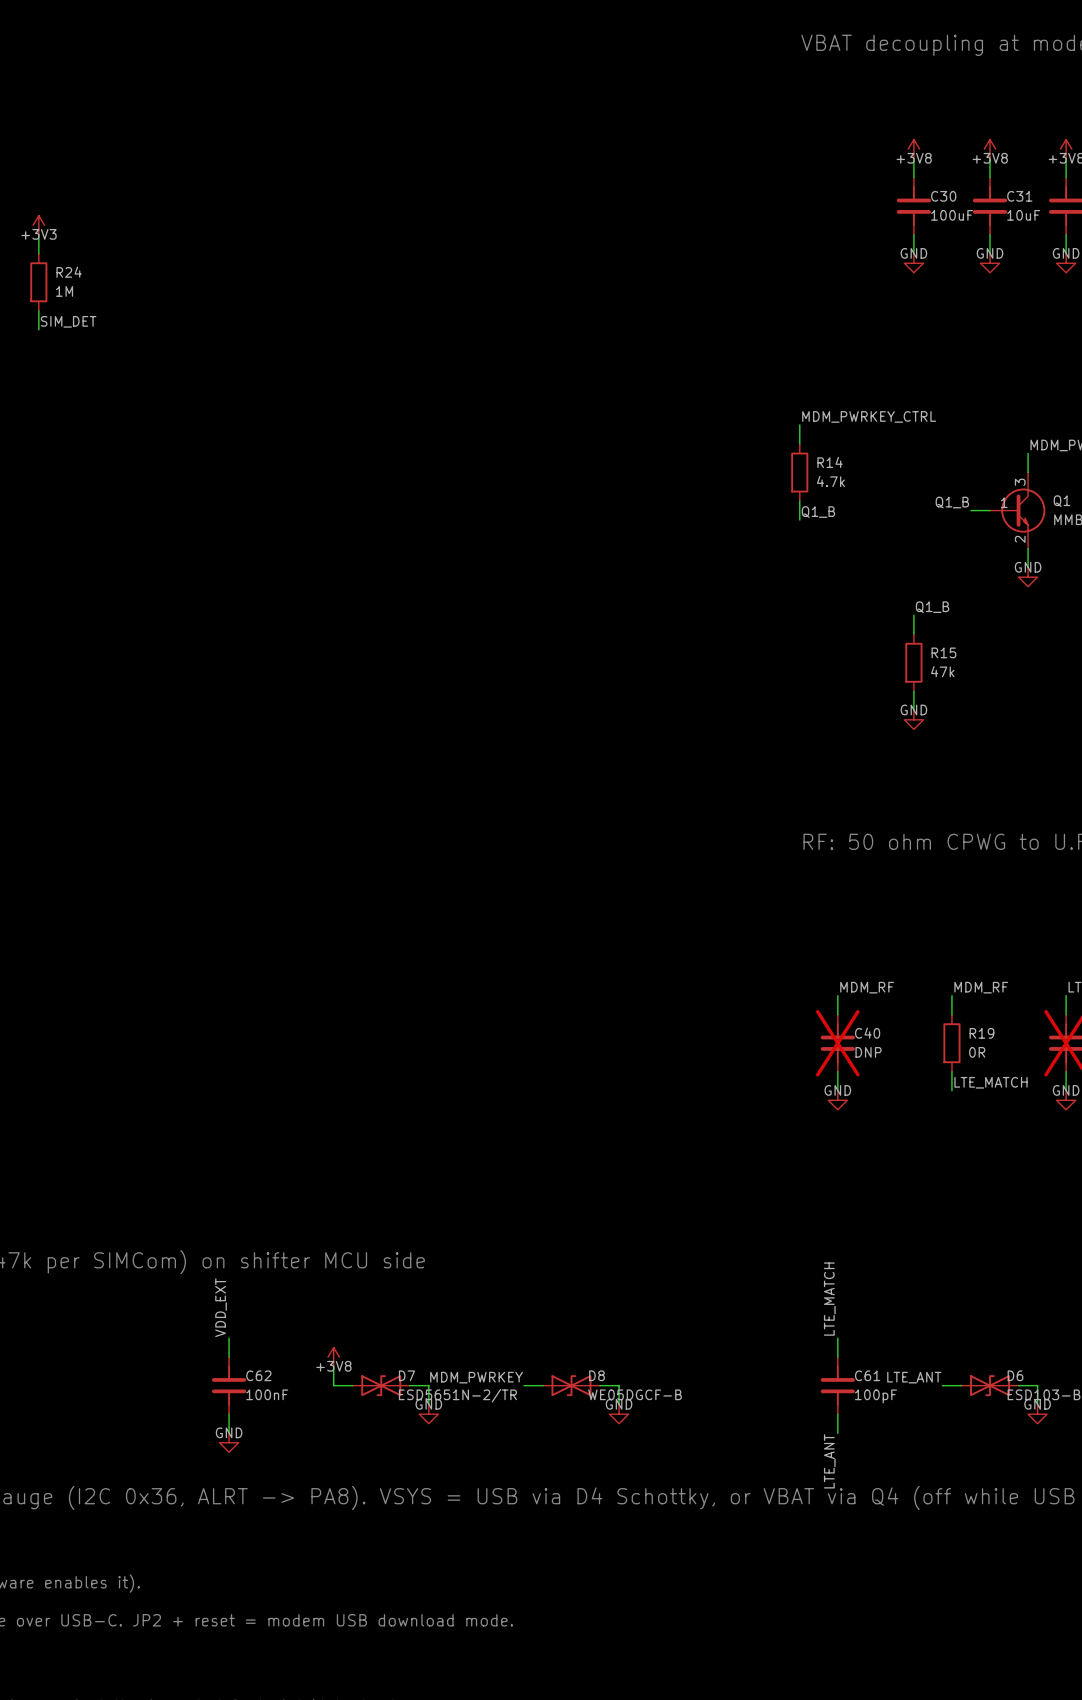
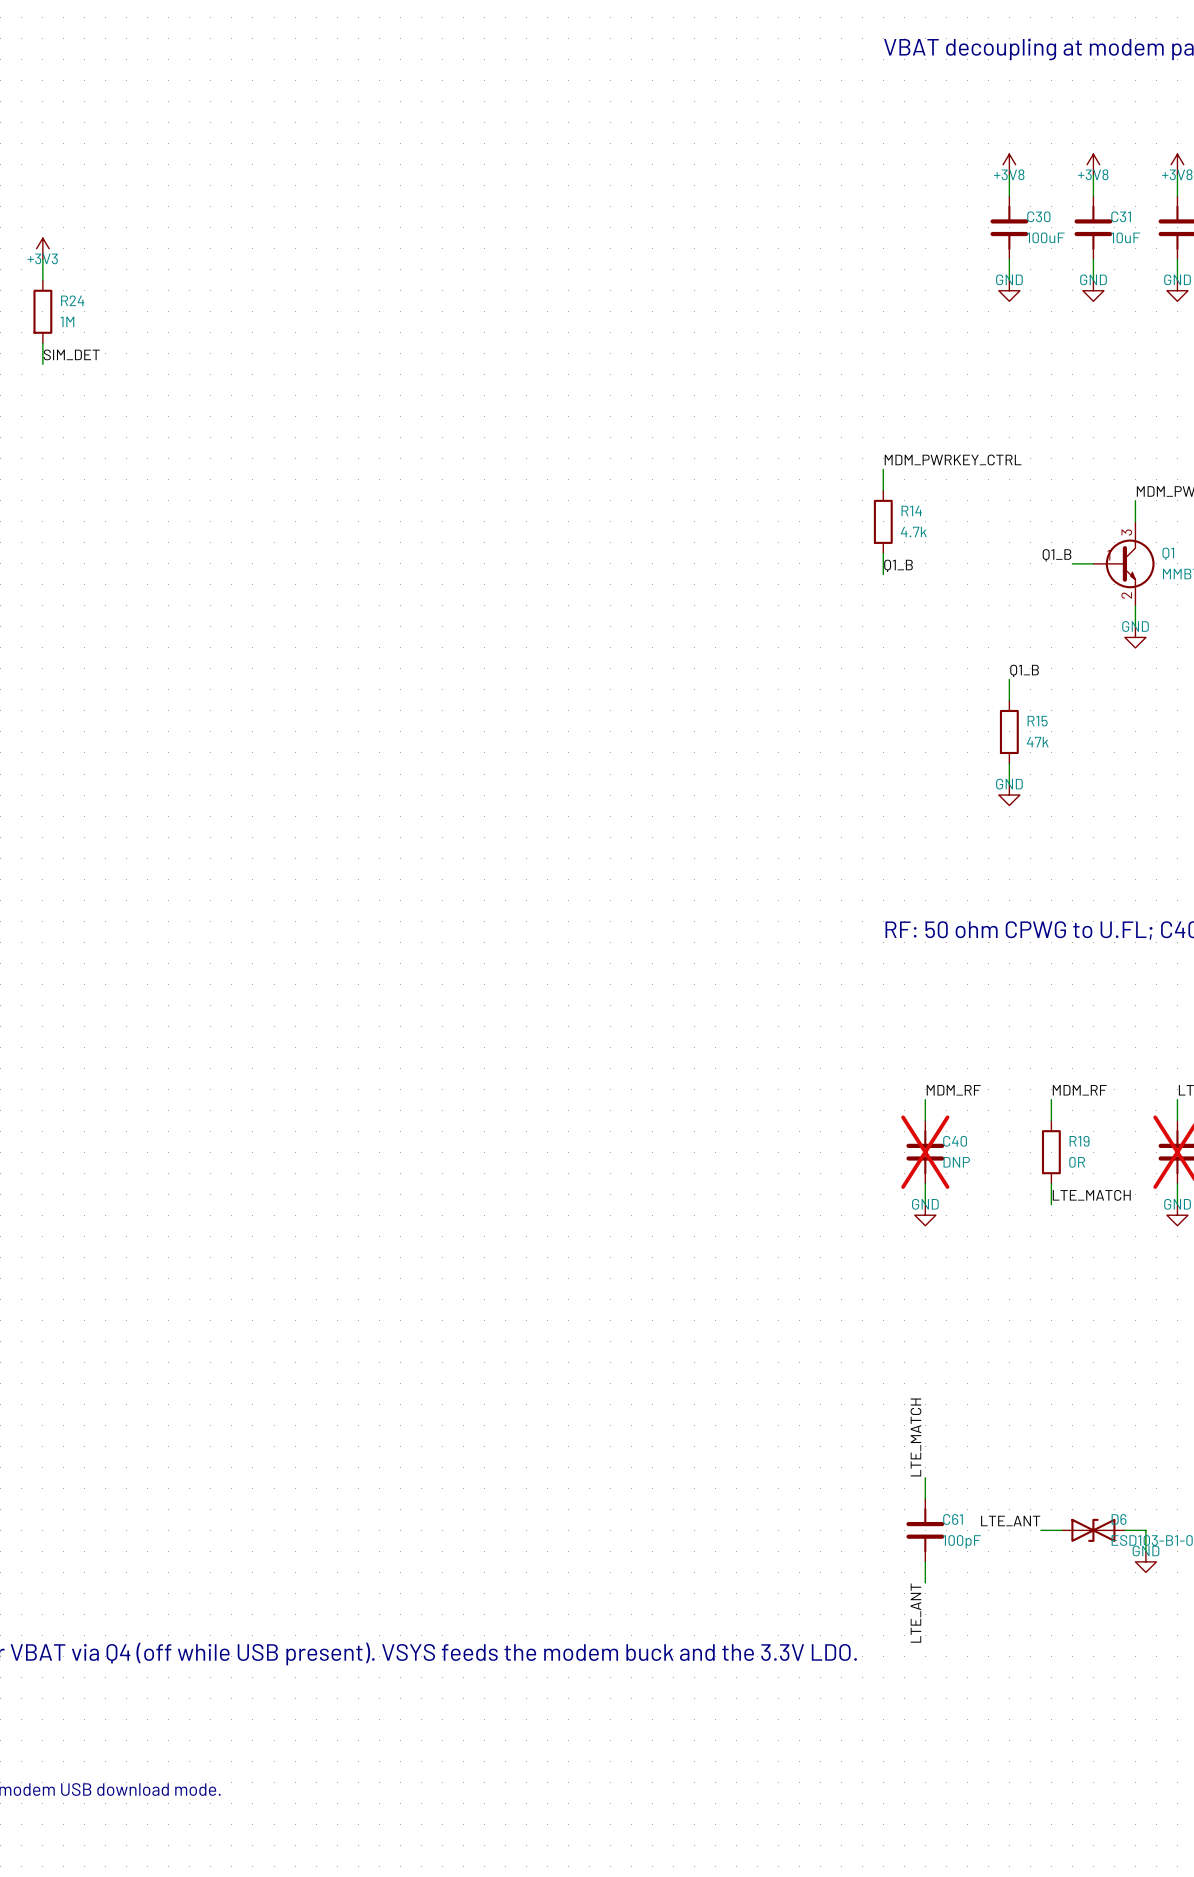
label: VDD_EXT (221, 1307) -> none
wire: (229, 1338) (229, 1357) -> none
power symbol: +3V8 (333, 1357) -> none
wire: (333, 1366) (333, 1385) (352, 1385) -> none
label: MDM_PWRKEY (476, 1377) -> none
C62: 100nF (229, 1385) -> none
D7: ESD5651N-2/TR (381, 1385) -> none
wire: (409, 1385) (428, 1385) (428, 1404) -> none
wire: (523, 1385) (542, 1385) -> none
D8: WE05DGCF-B (571, 1385) -> none
wire: (600, 1385) (619, 1385) (619, 1404) -> none
wire: (229, 1414) (229, 1433) -> none
power symbol: GND (428, 1414) -> none
power symbol: GND (619, 1414) -> none
power symbol: GND (229, 1442) -> none

